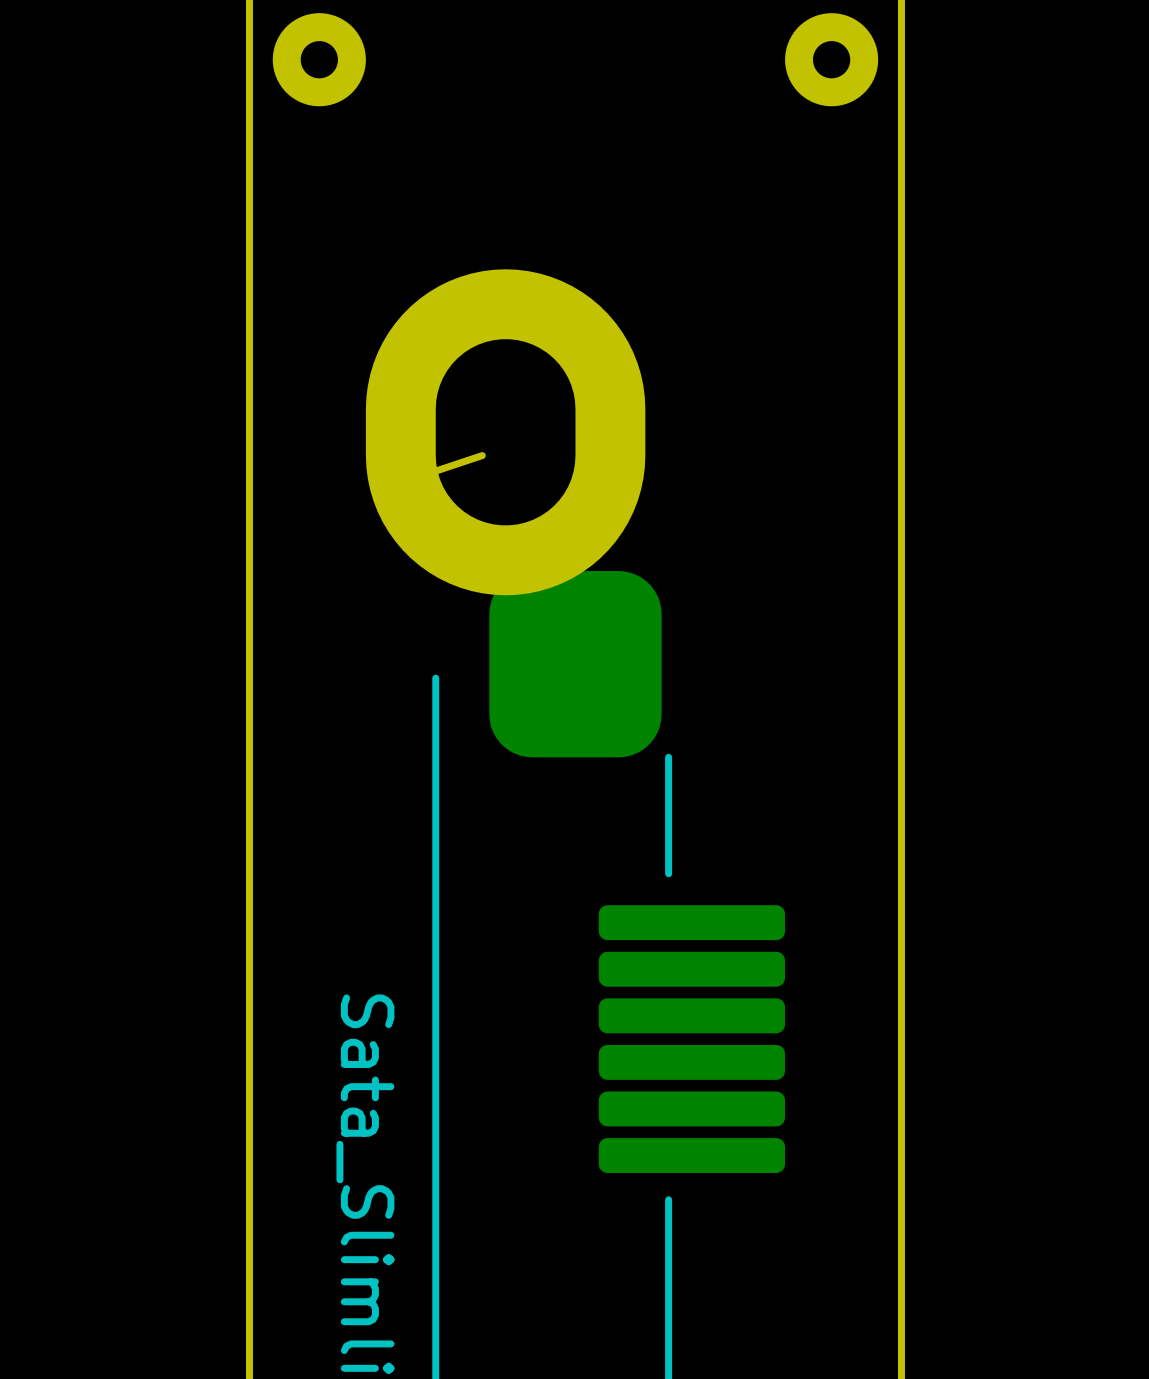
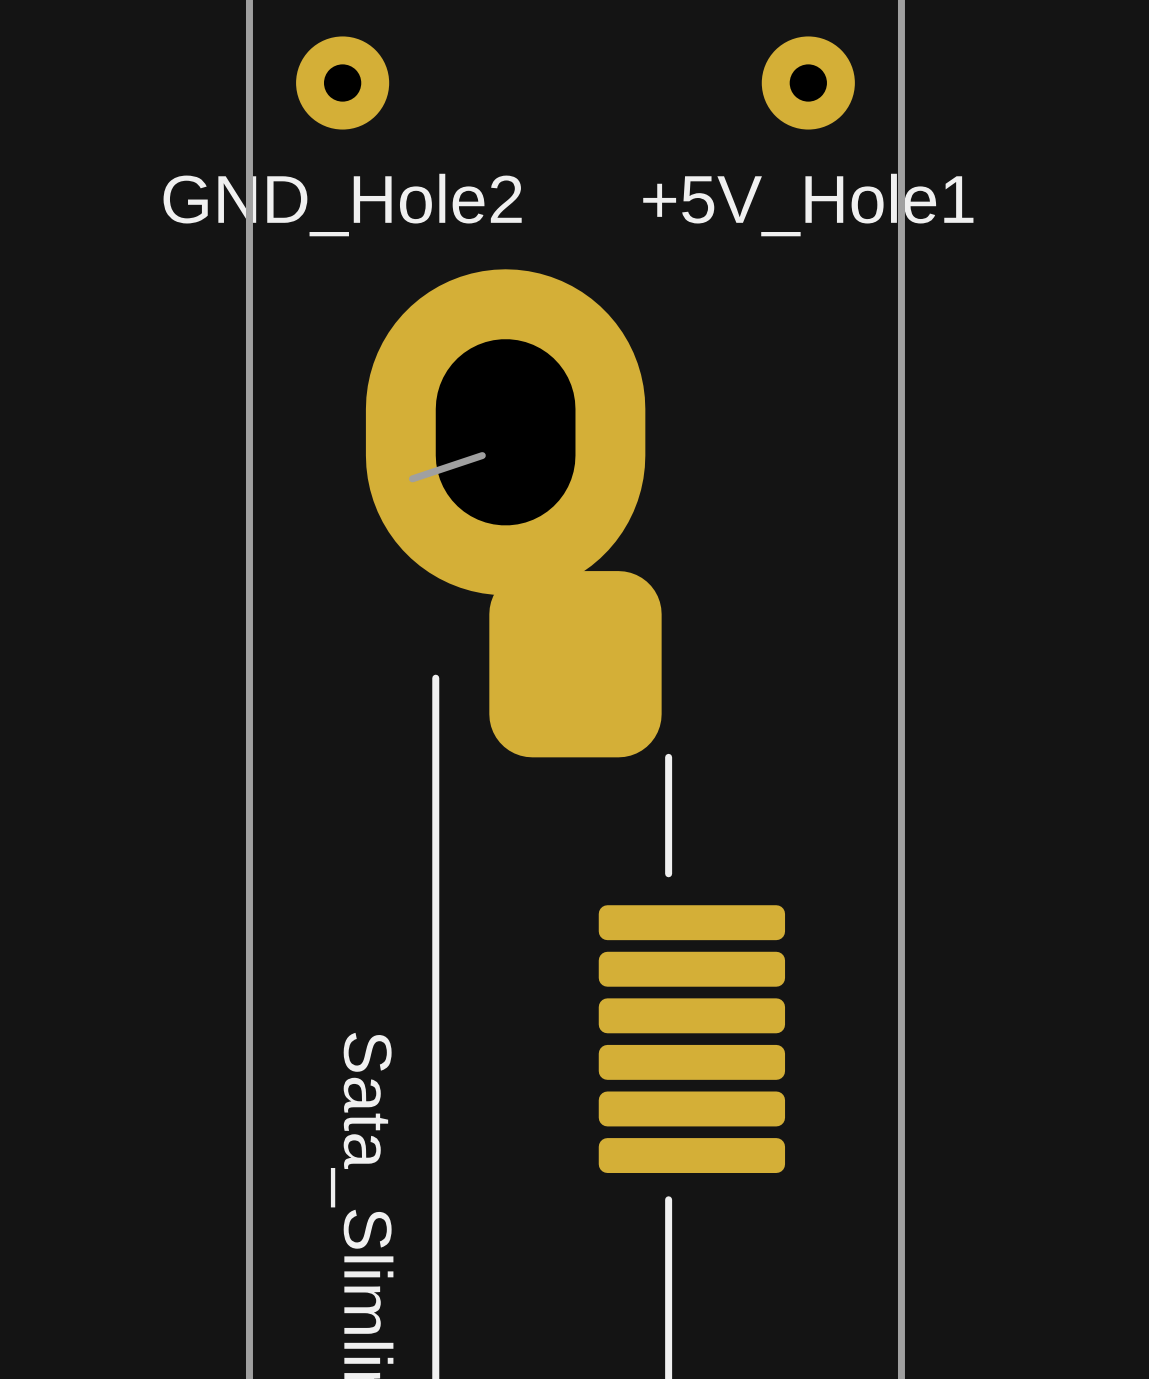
GND_Hole2 position: (319, 59) -> (342, 83)
+5V_Hole1 position: (831, 59) -> (808, 83)

